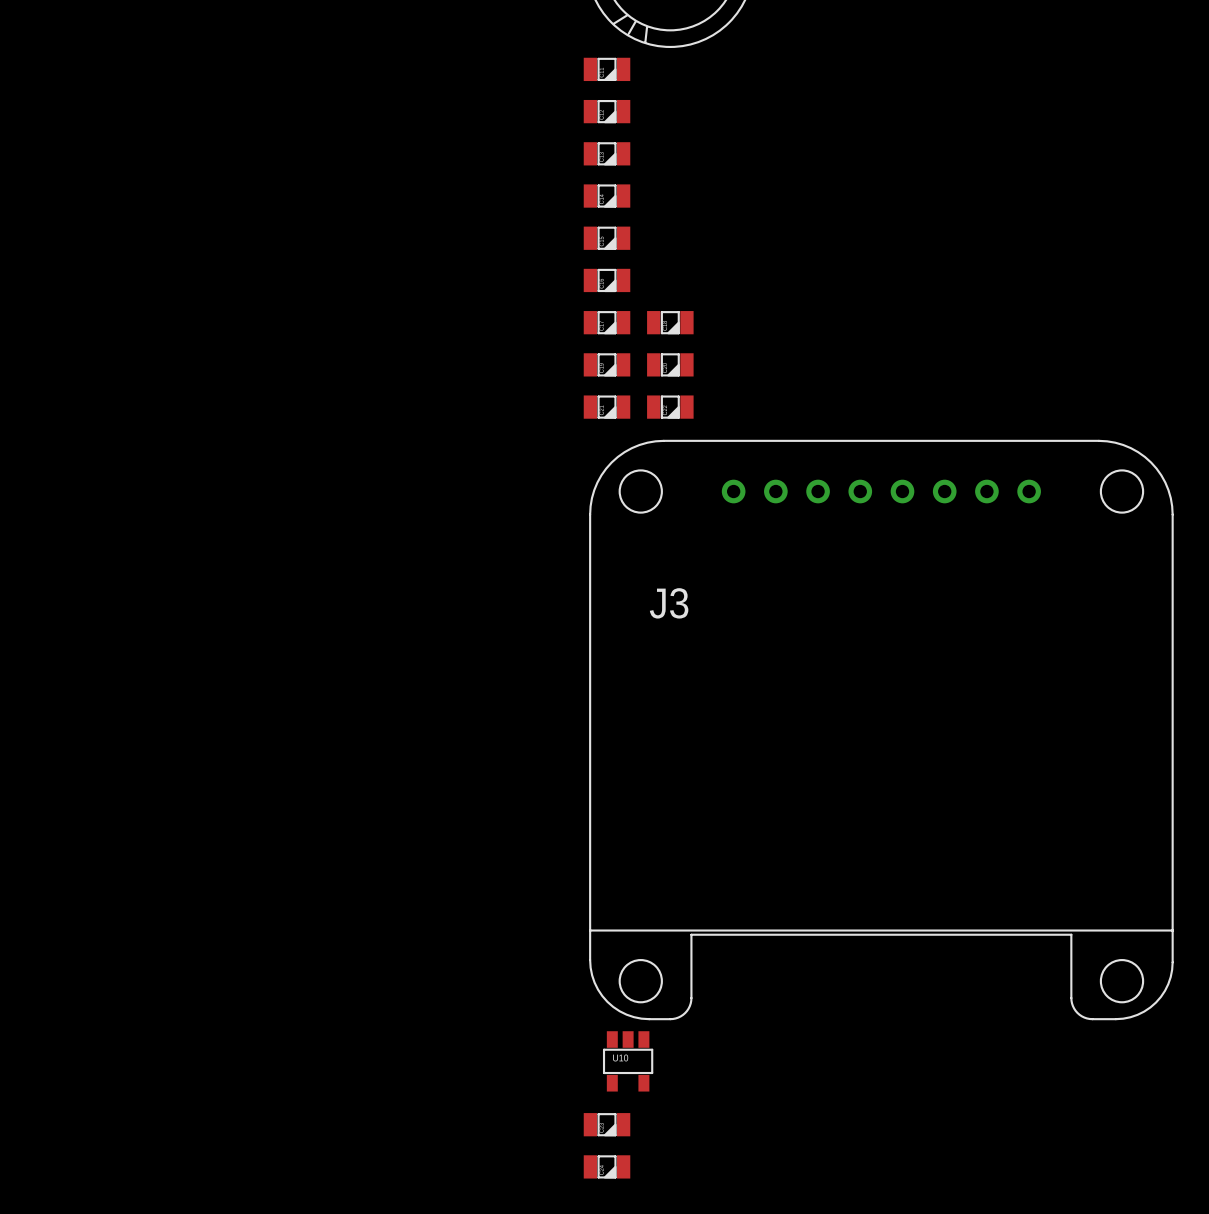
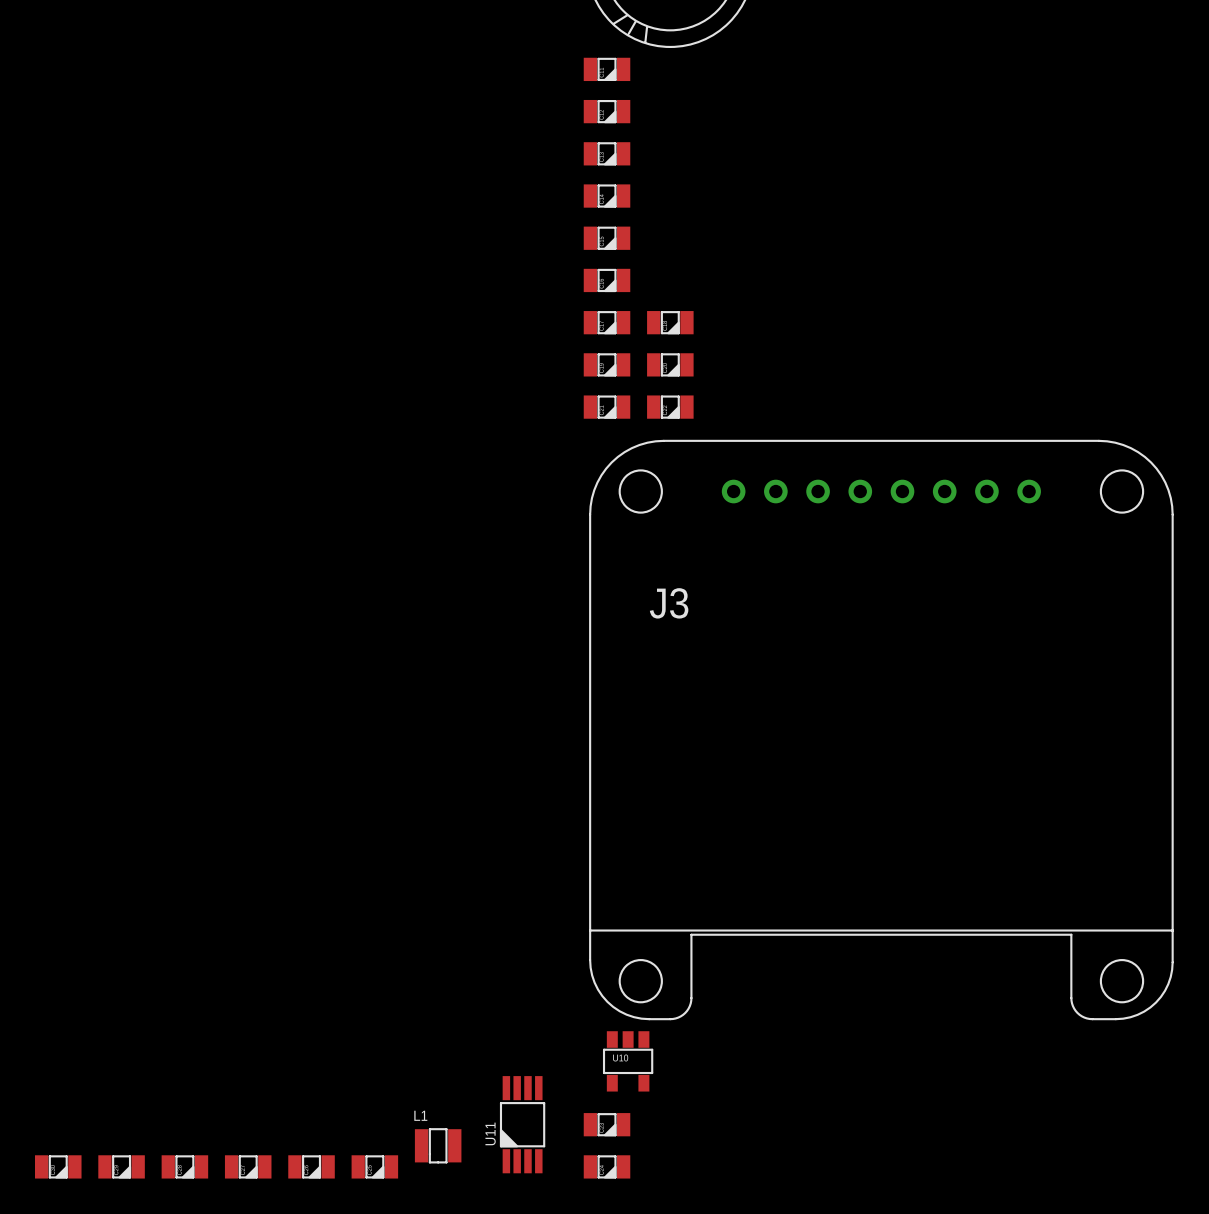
U11: none -> (522, 1124)
L1: none -> (438, 1145)
part: none -> (58, 1166)
part: none -> (121, 1166)
part: none -> (184, 1166)
part: none -> (248, 1166)
part: none -> (311, 1166)
part: none -> (374, 1166)

